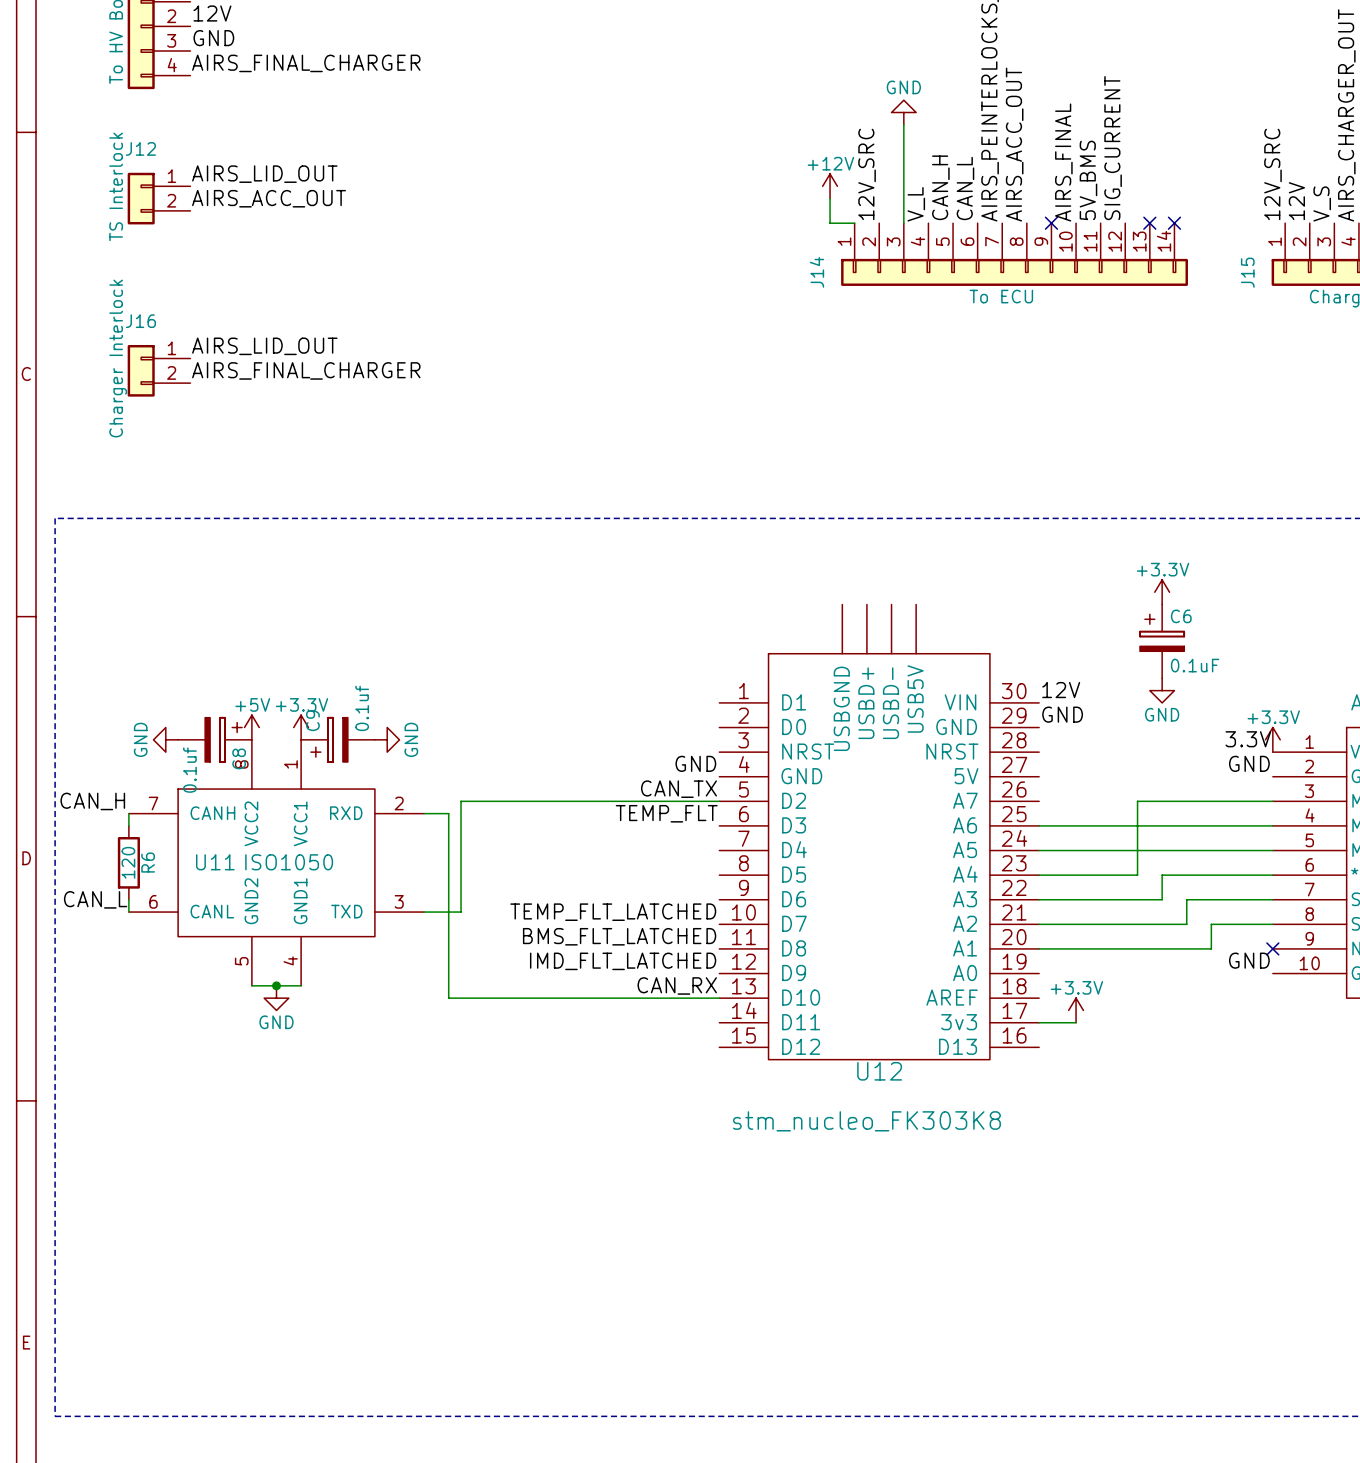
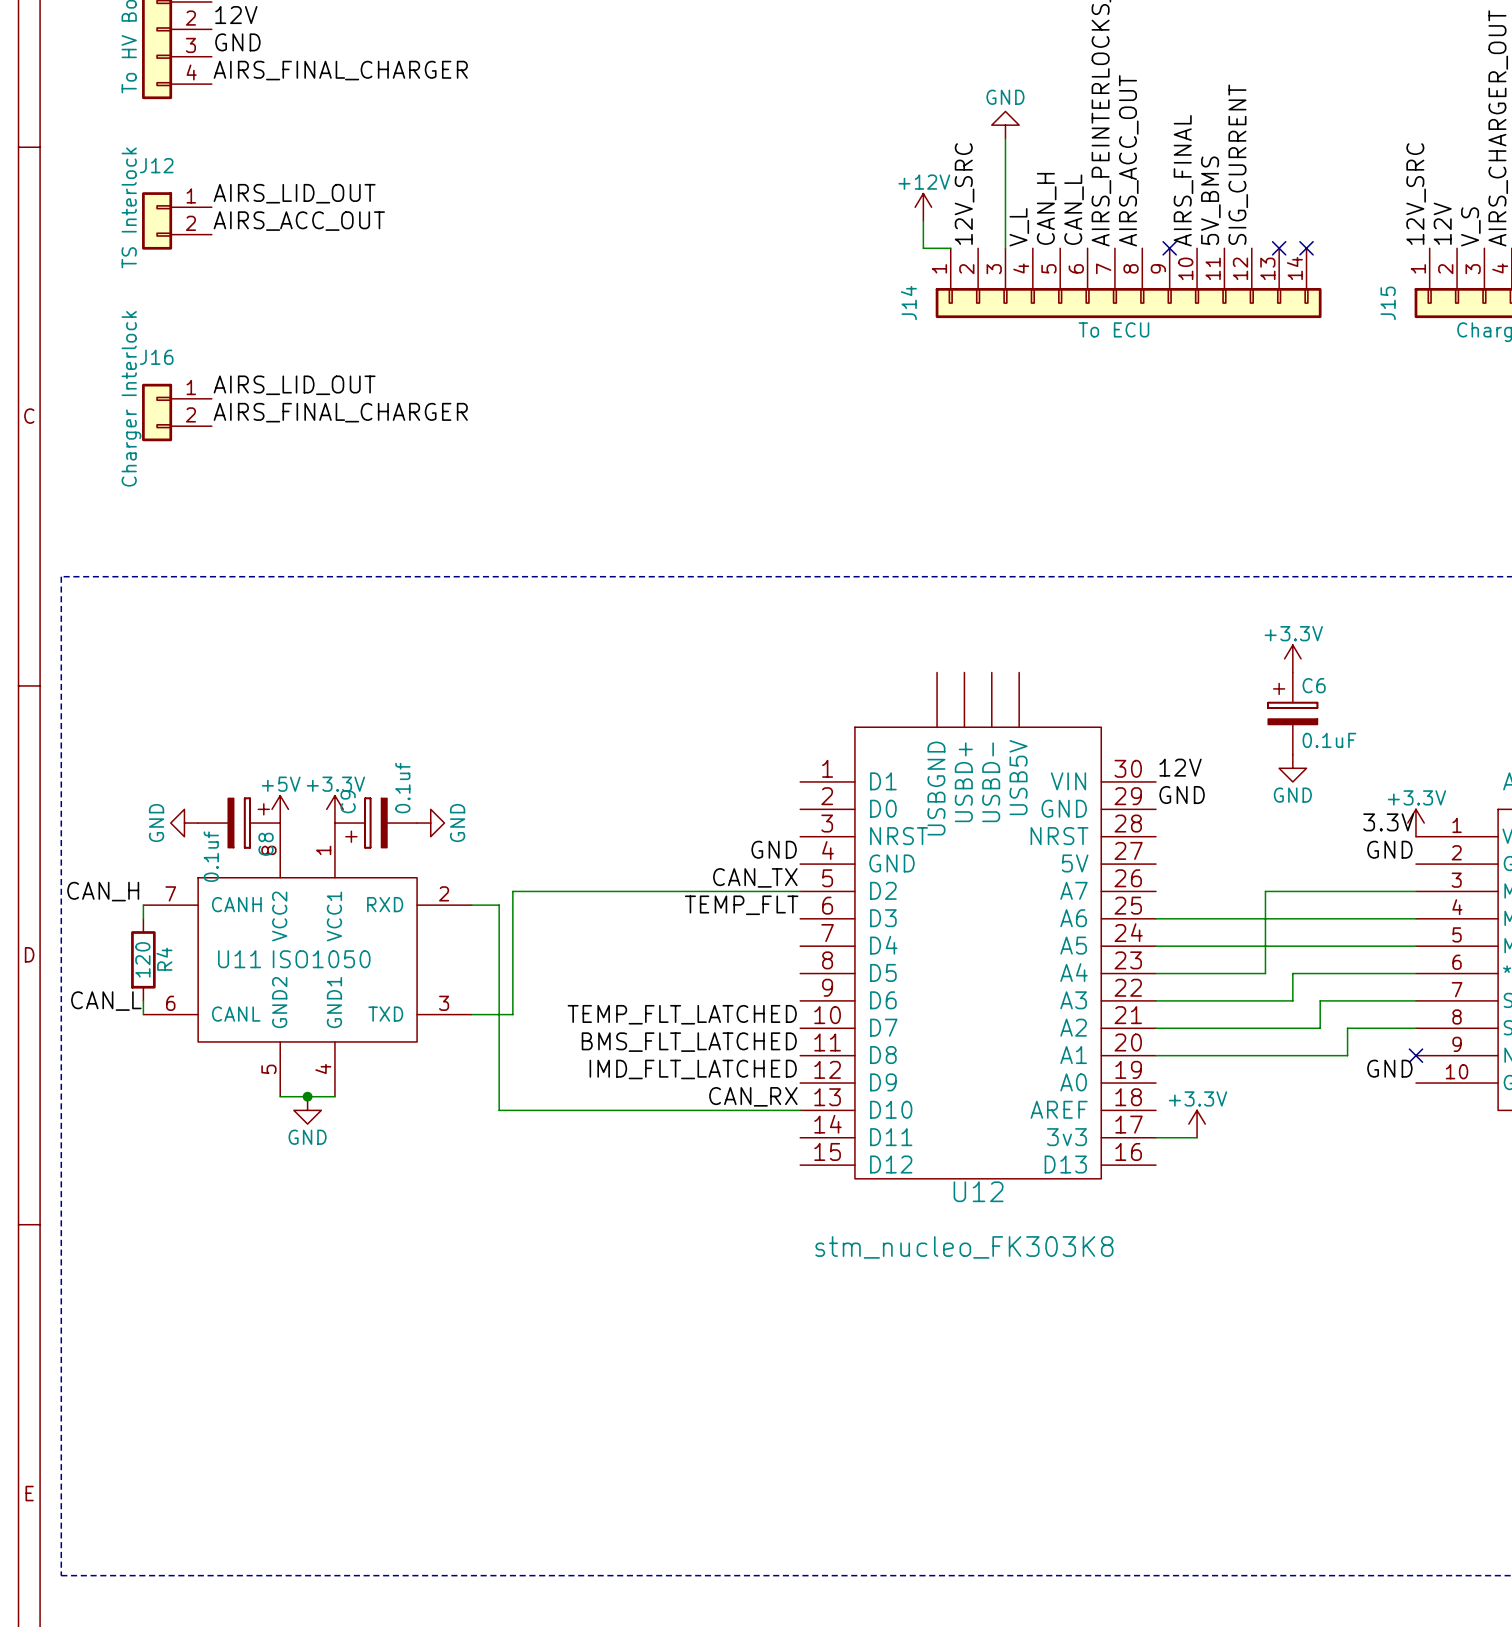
R6 name: R6 (148, 862) -> R4 (164, 959)

